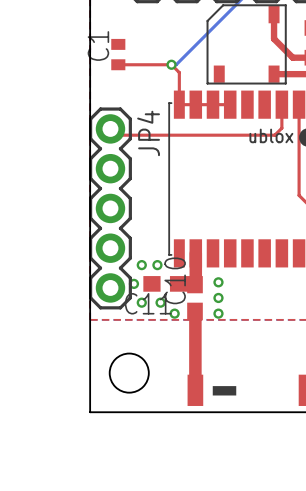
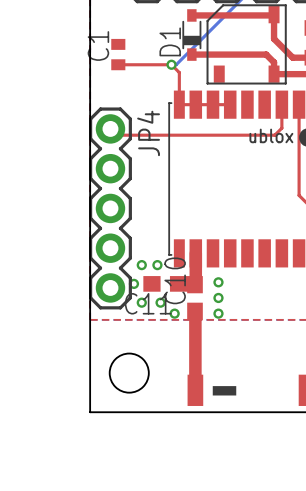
top track: none -> (191, 15) (274, 15)
D1: none -> (191, 35)
top track: none -> (191, 54) (266, 54) (274, 62) (274, 74)

